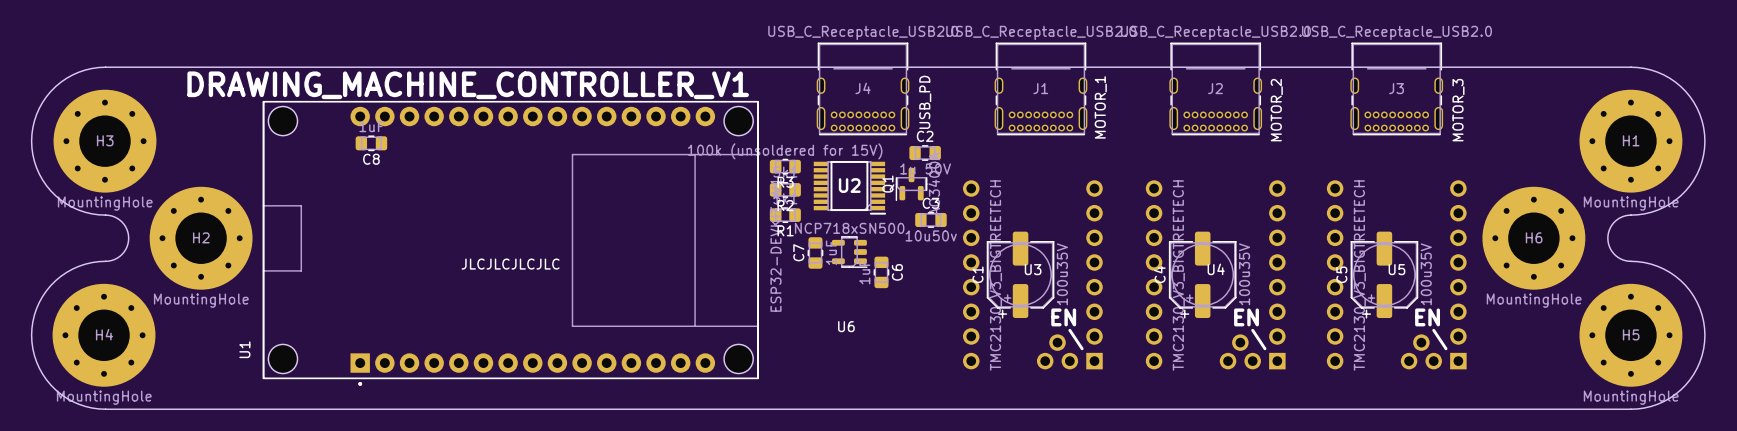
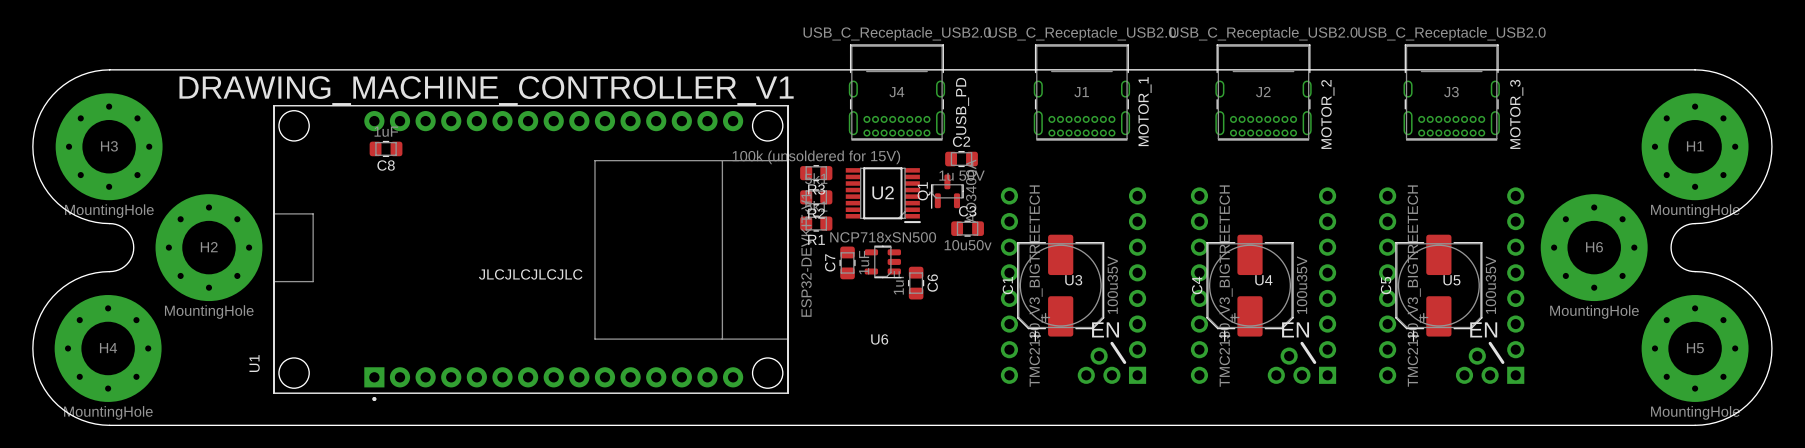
C1 footprint: [986, 231, 1055, 319] -> [1017, 234, 1105, 342]
C4 footprint: [1169, 231, 1237, 319] -> [1206, 234, 1294, 342]
C5 footprint: [1350, 231, 1419, 319] -> [1395, 234, 1483, 342]

